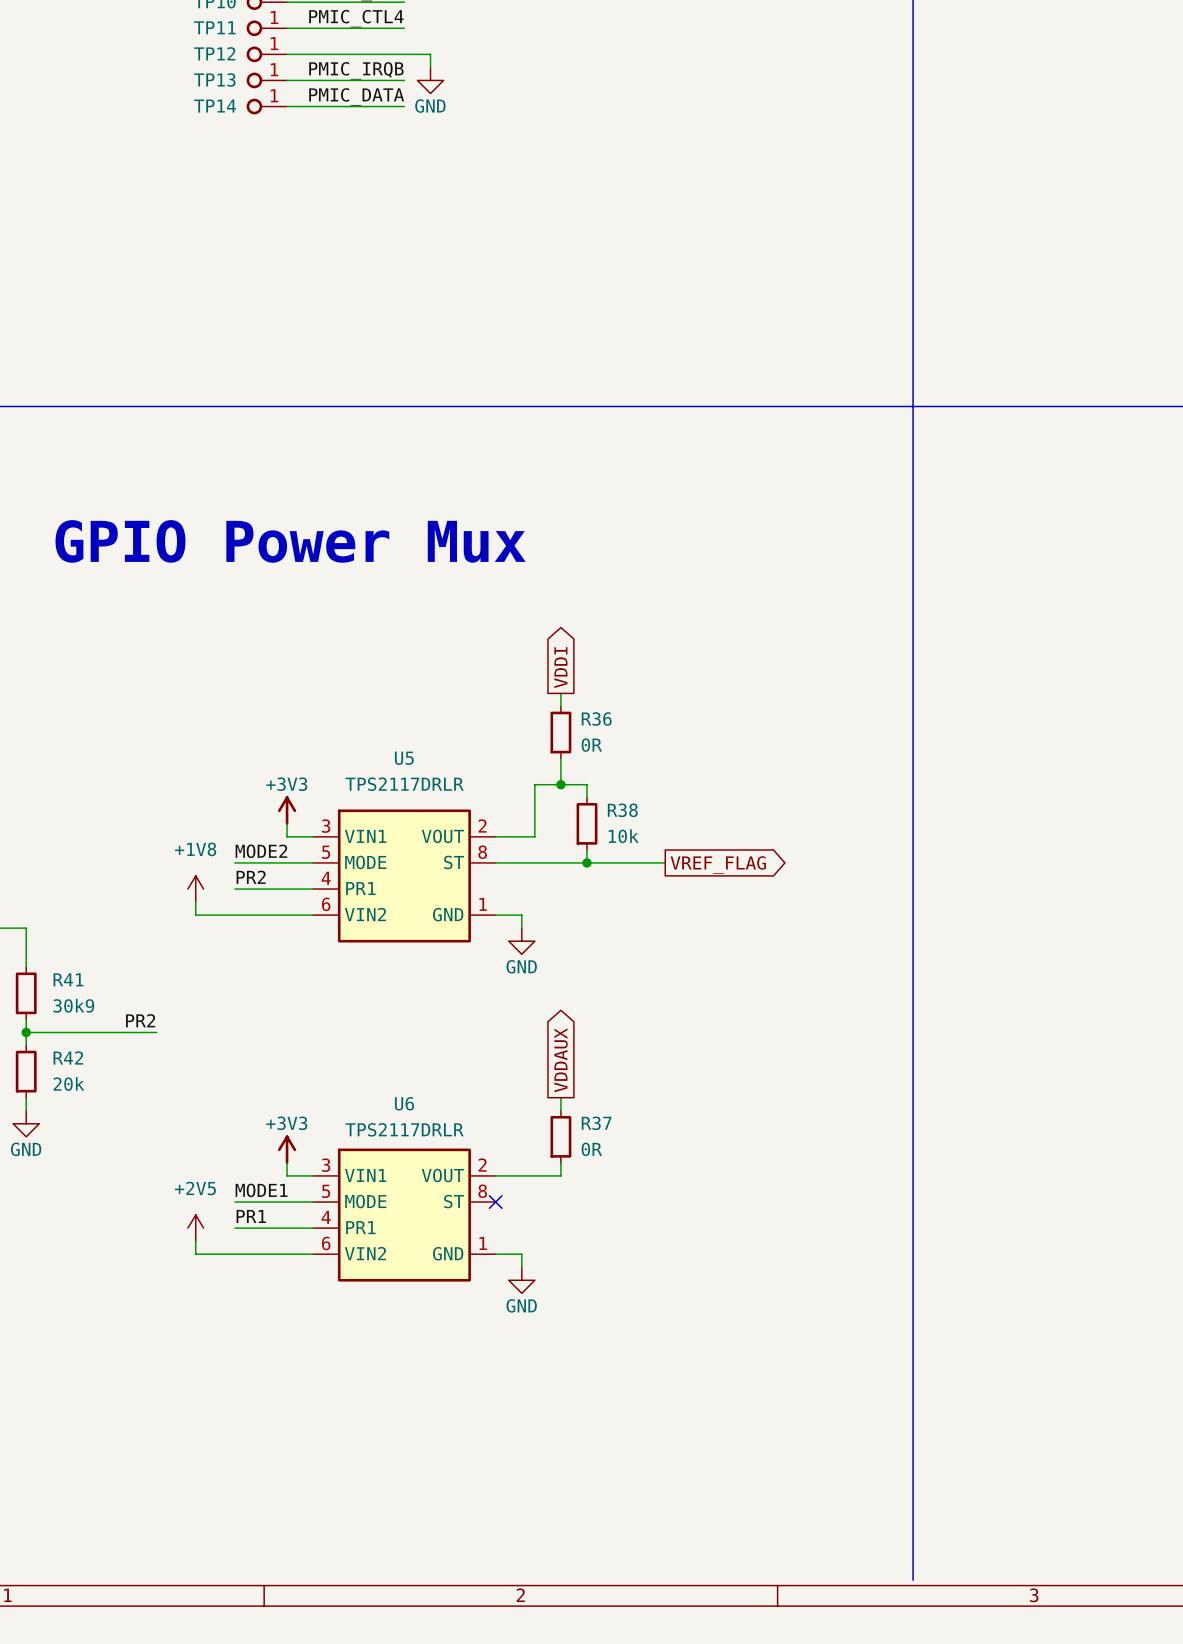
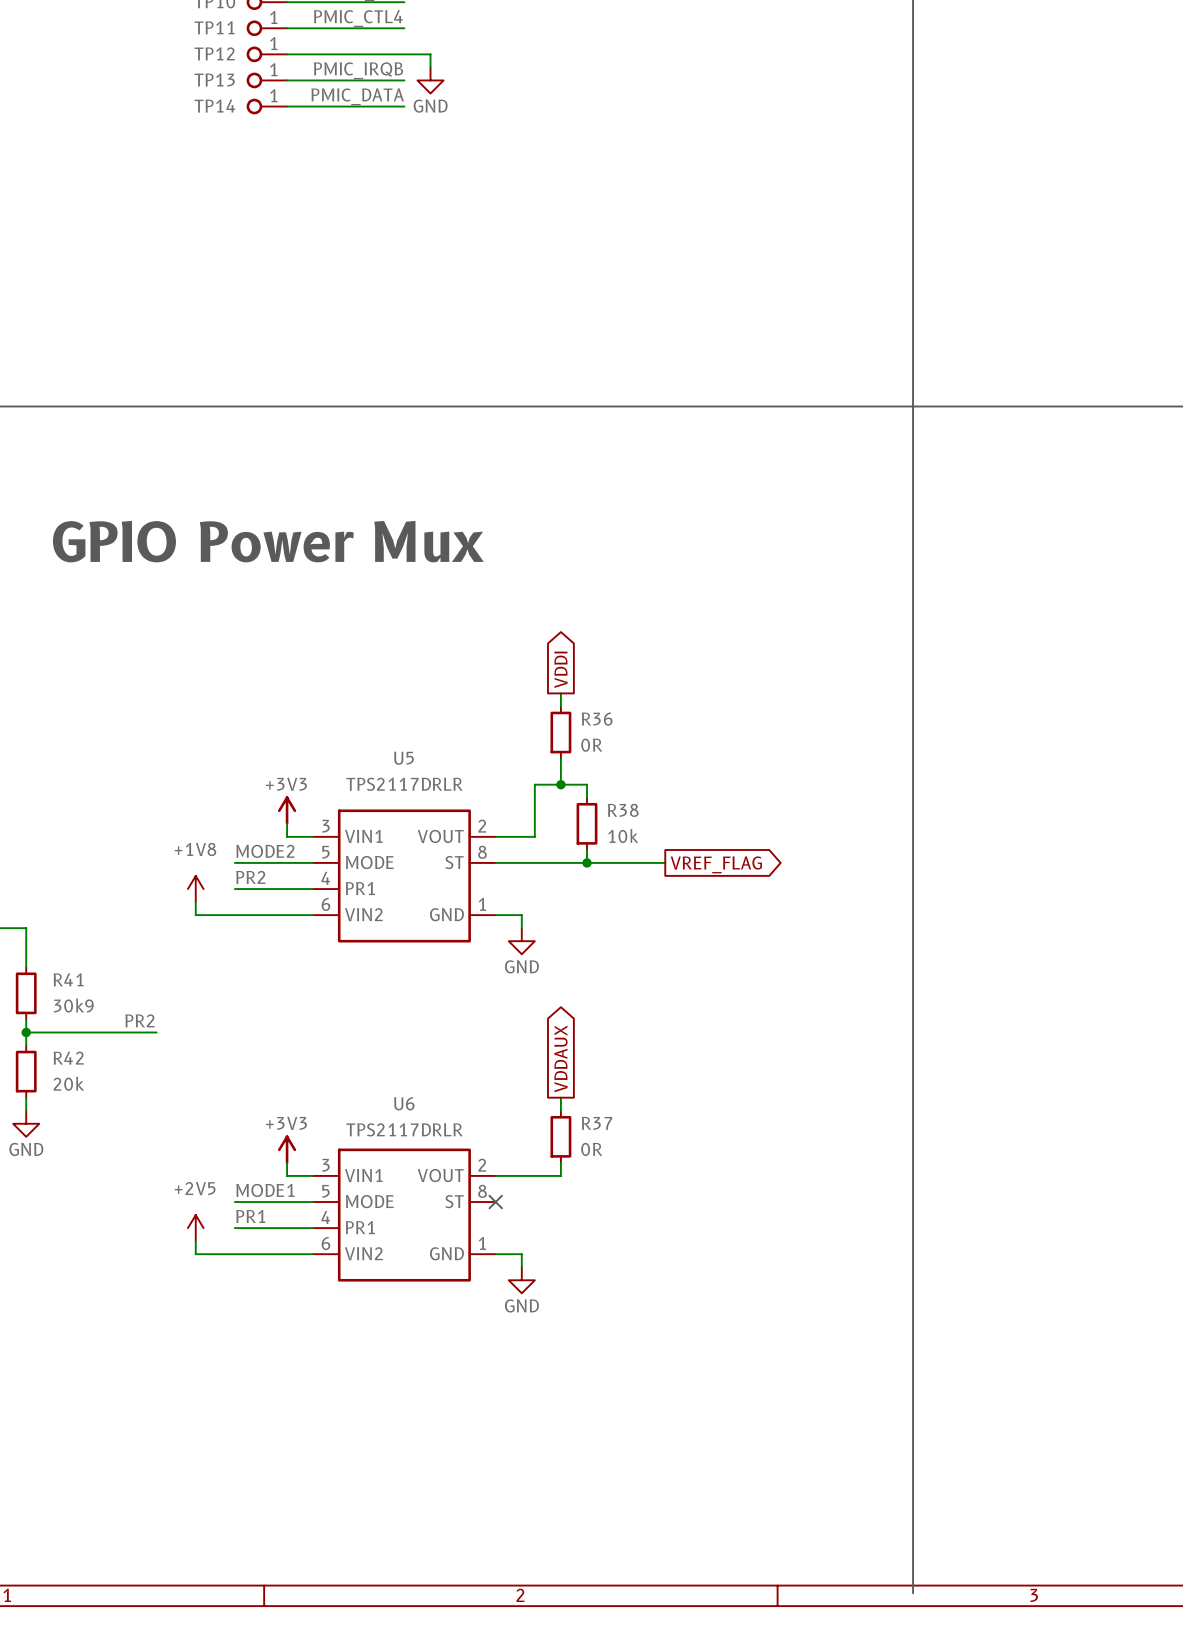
line: none -> (913, 1580) (913, 1593)

